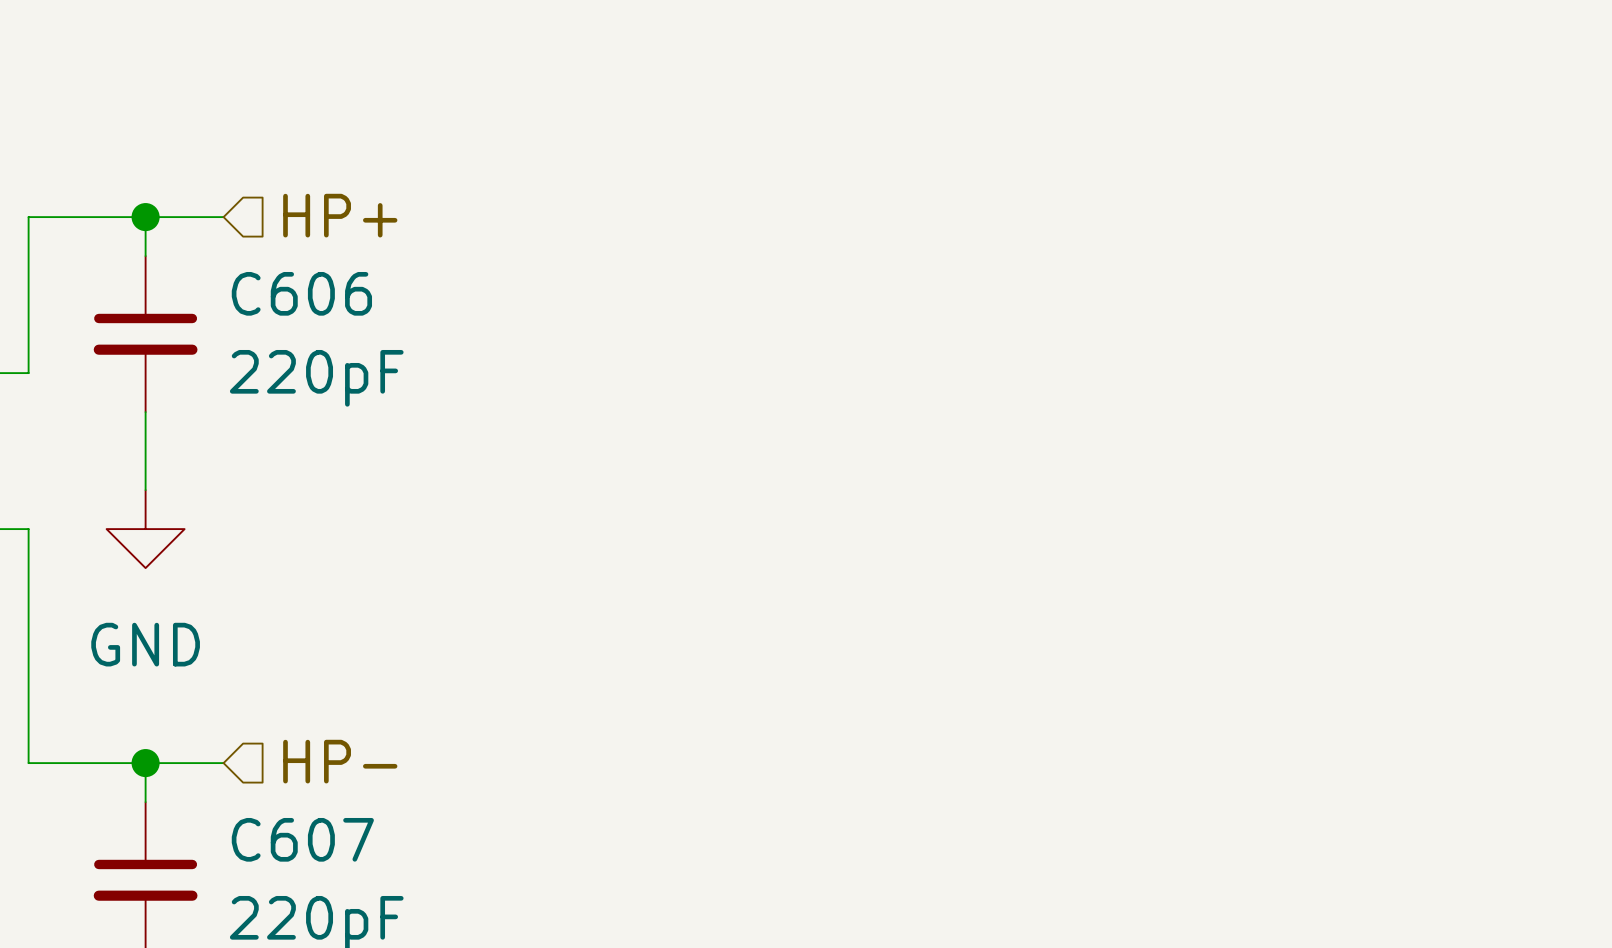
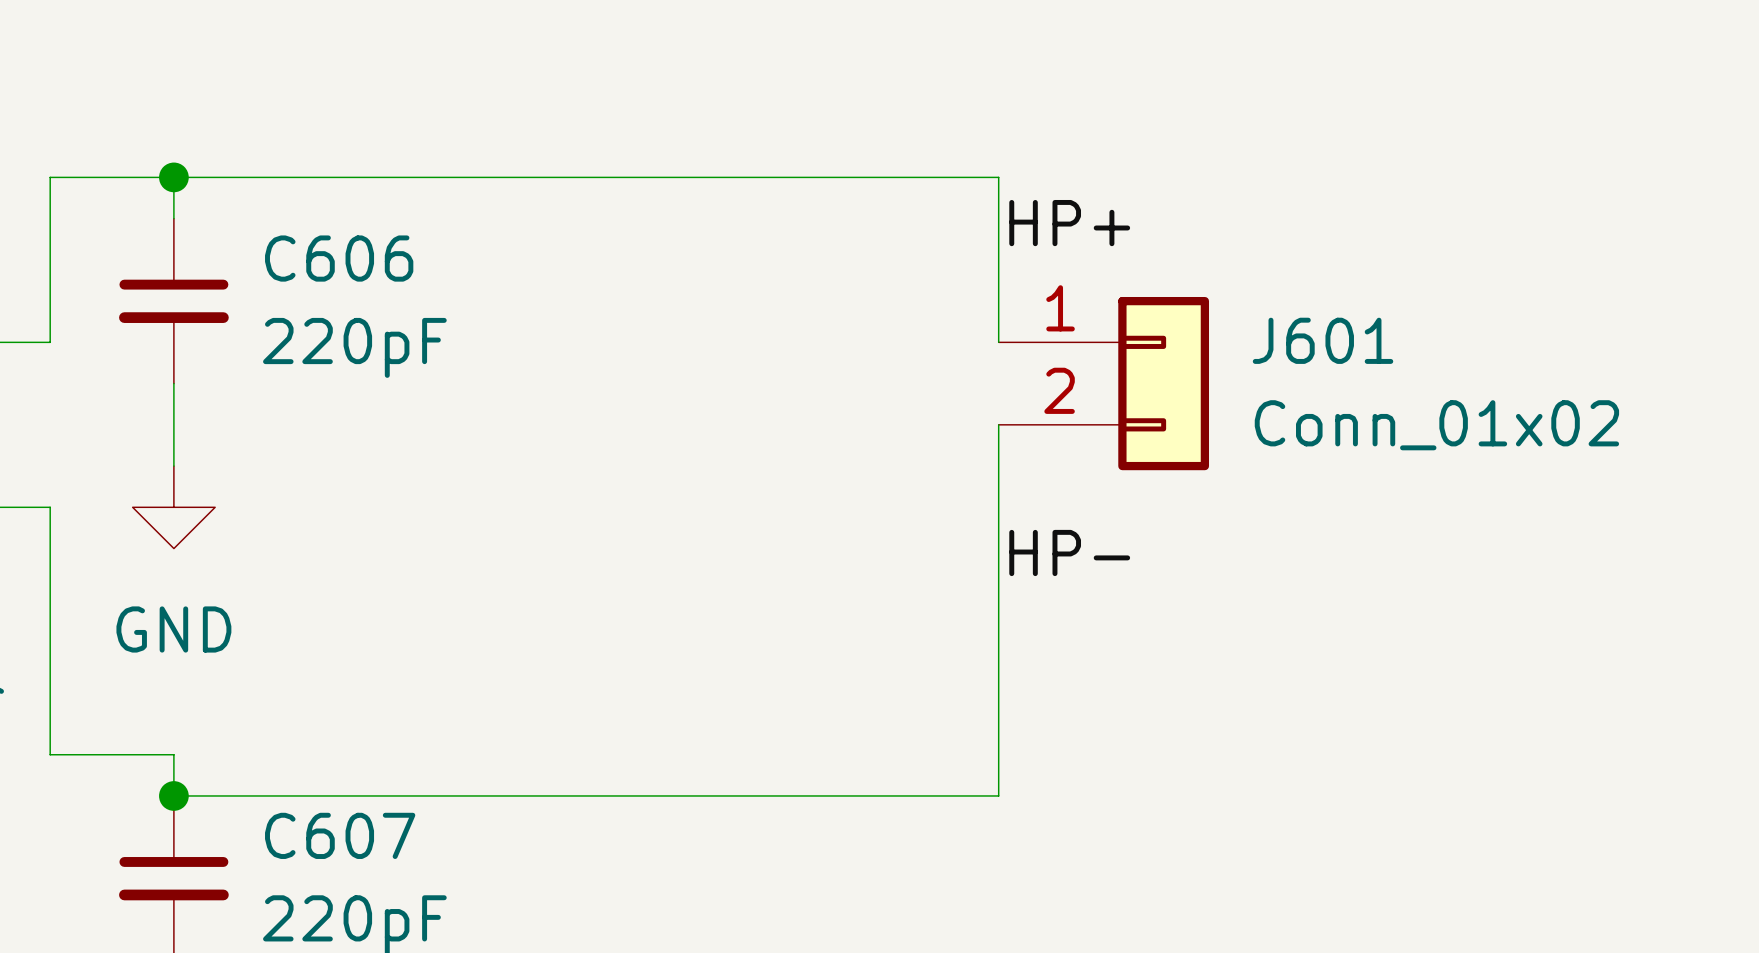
hierarchical label: HP+ (340, 215) -> none
wire: none -> (256, 177) (998, 177) (998, 342)
label: none -> HP+ (1069, 223)
J601: none -> Conn_01x02 (1103, 383)
wire: none -> (998, 424) (998, 795) (173, 795)
label: none -> HP- (1069, 552)
hierarchical label: HP- (340, 761) -> none
wire: (145, 763) (223, 763) -> none
junction position: (145, 763) -> (173, 795)

